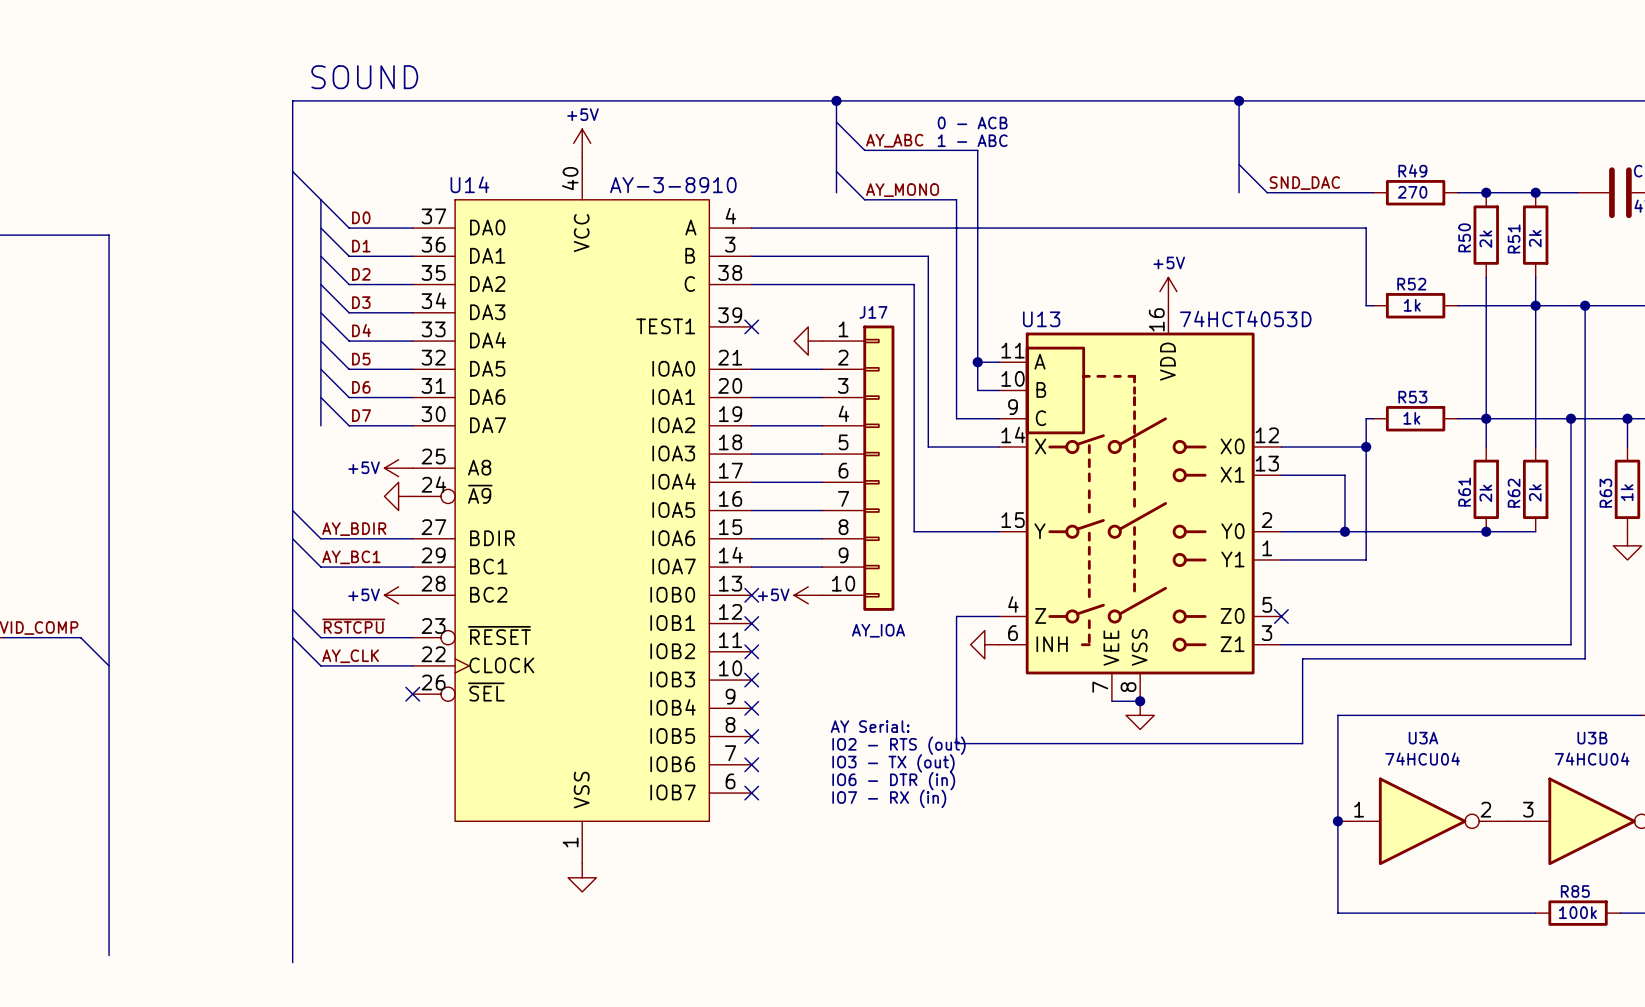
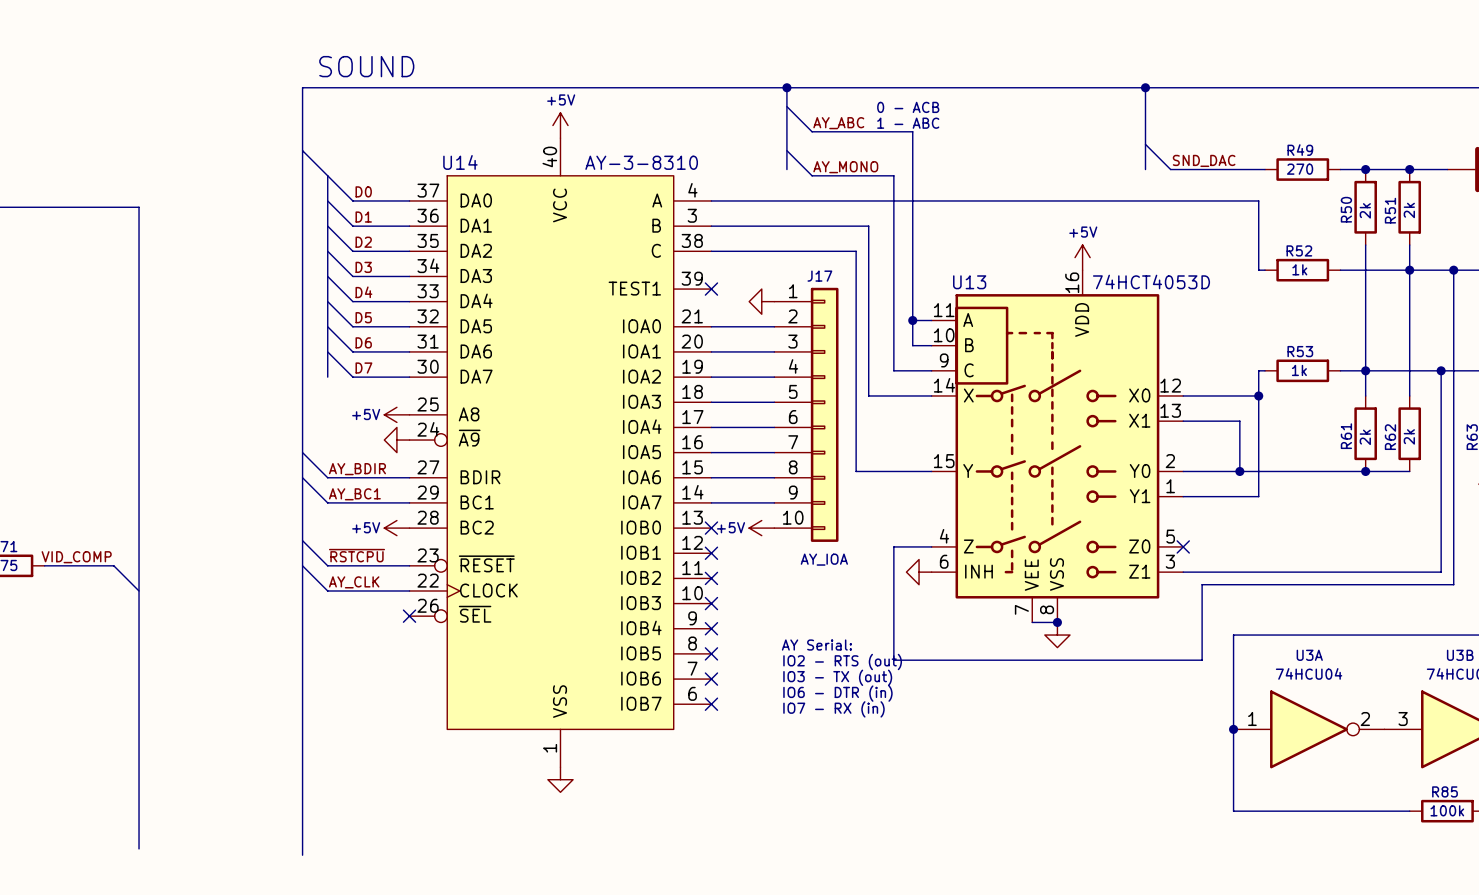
U14 value: AY-3-8910 (673, 185) -> AY-3-8310 (641, 162)

